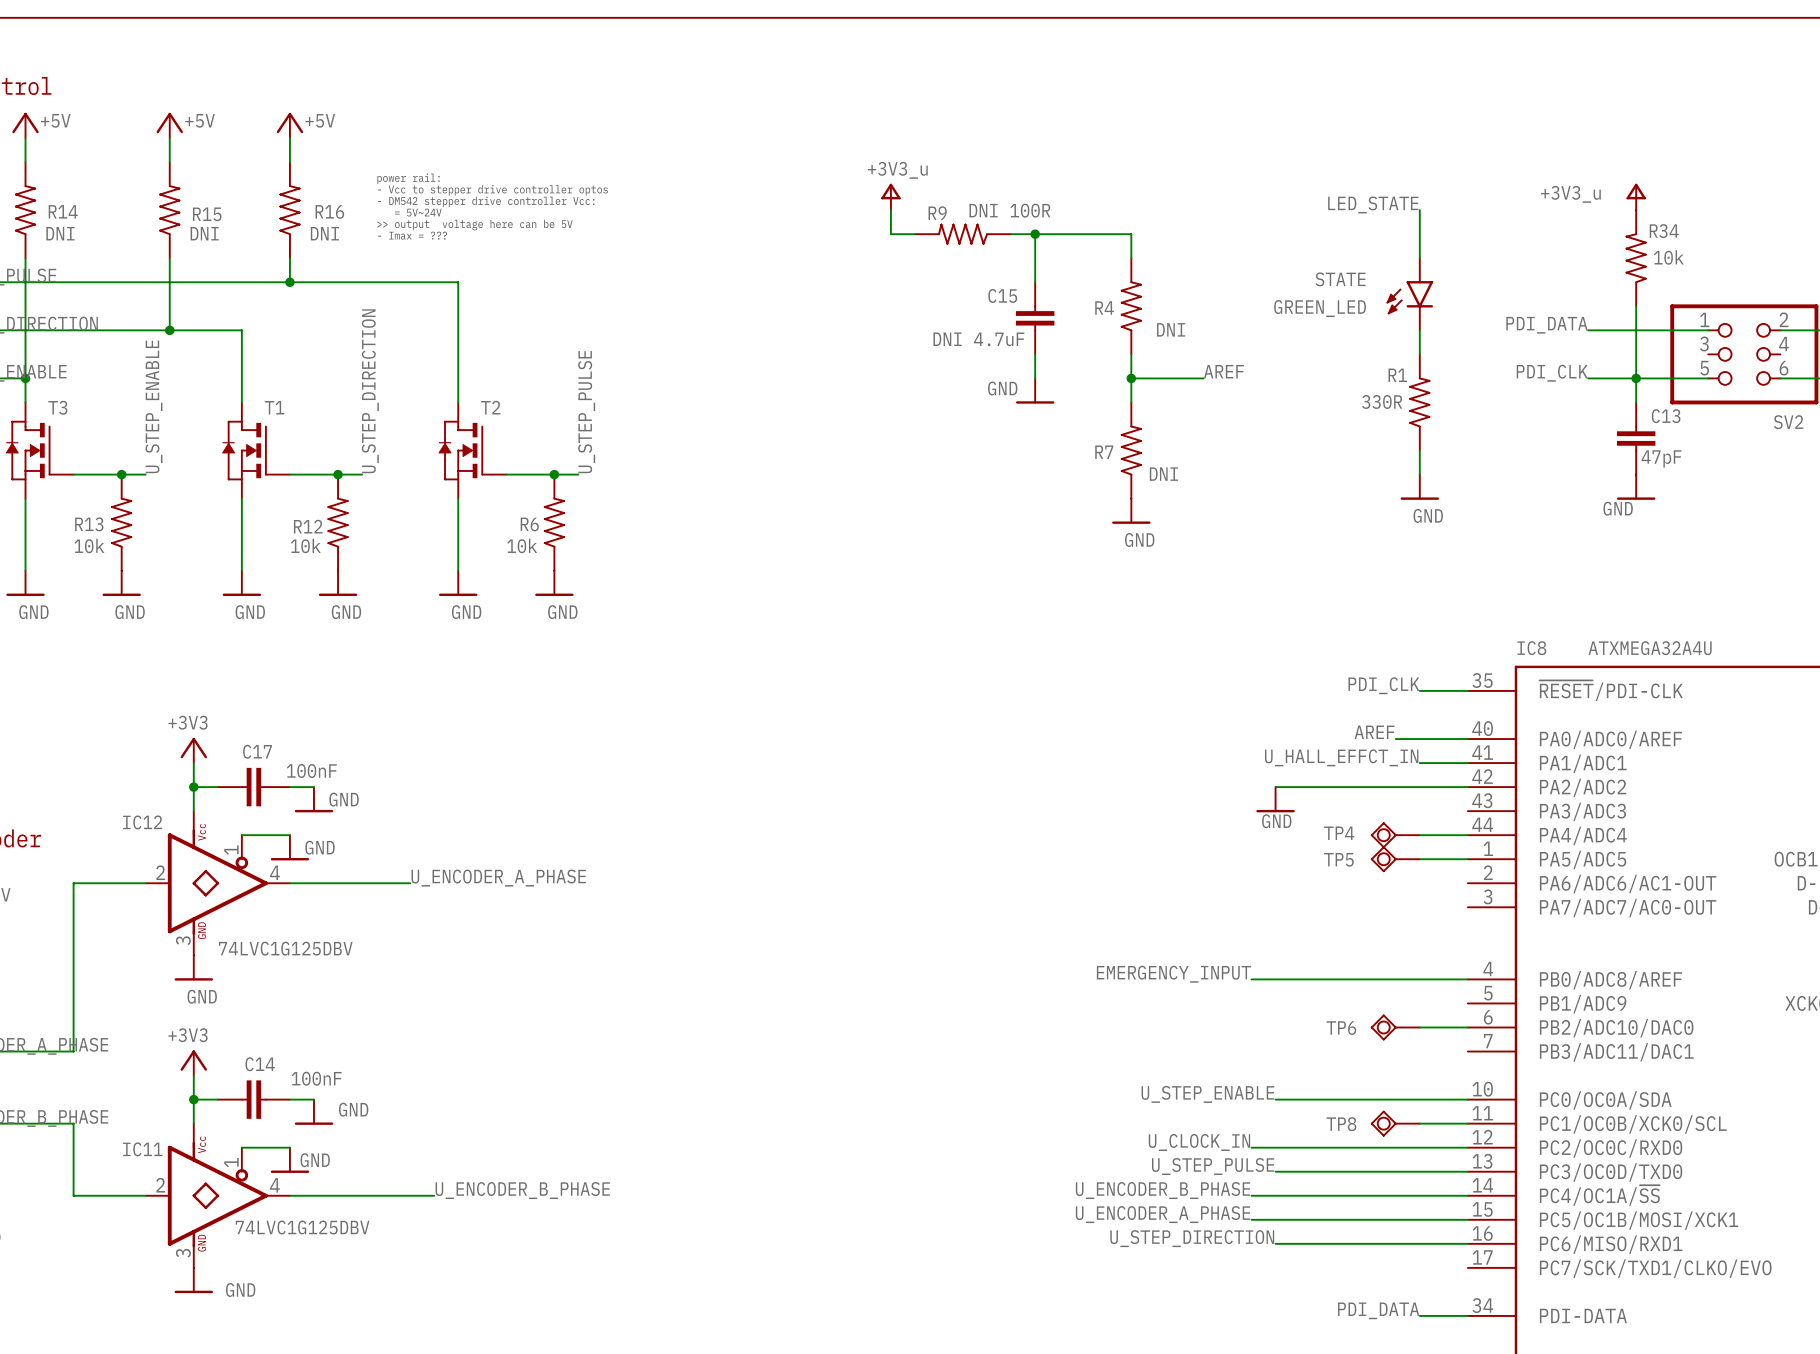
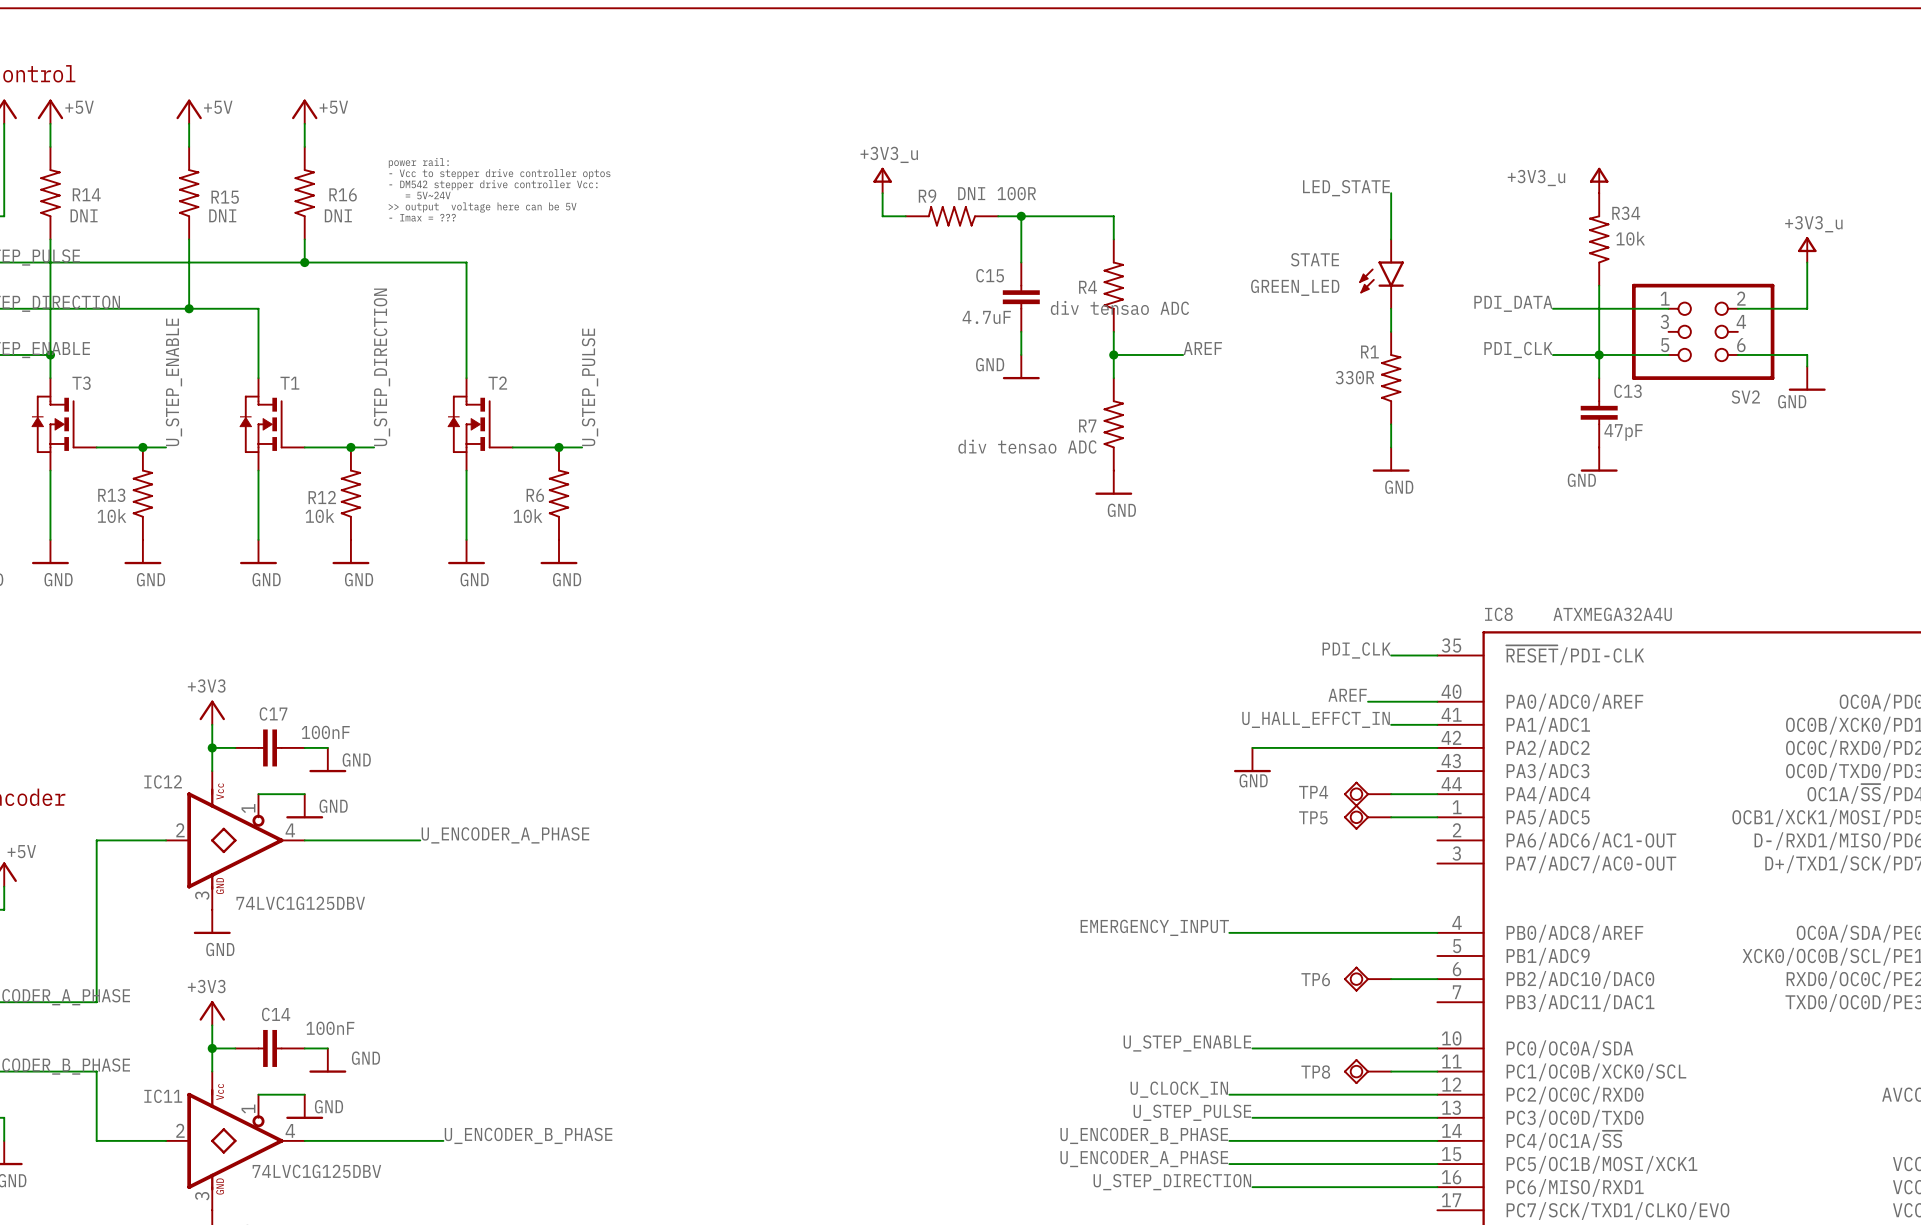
R4 value: DNI (1171, 329) -> div tensao ADC (1119, 307)
C15 value: DNI 4.7uF (978, 339) -> 4.7uF (986, 317)
R7 value: DNI (1163, 474) -> div tensao ADC (1027, 446)

